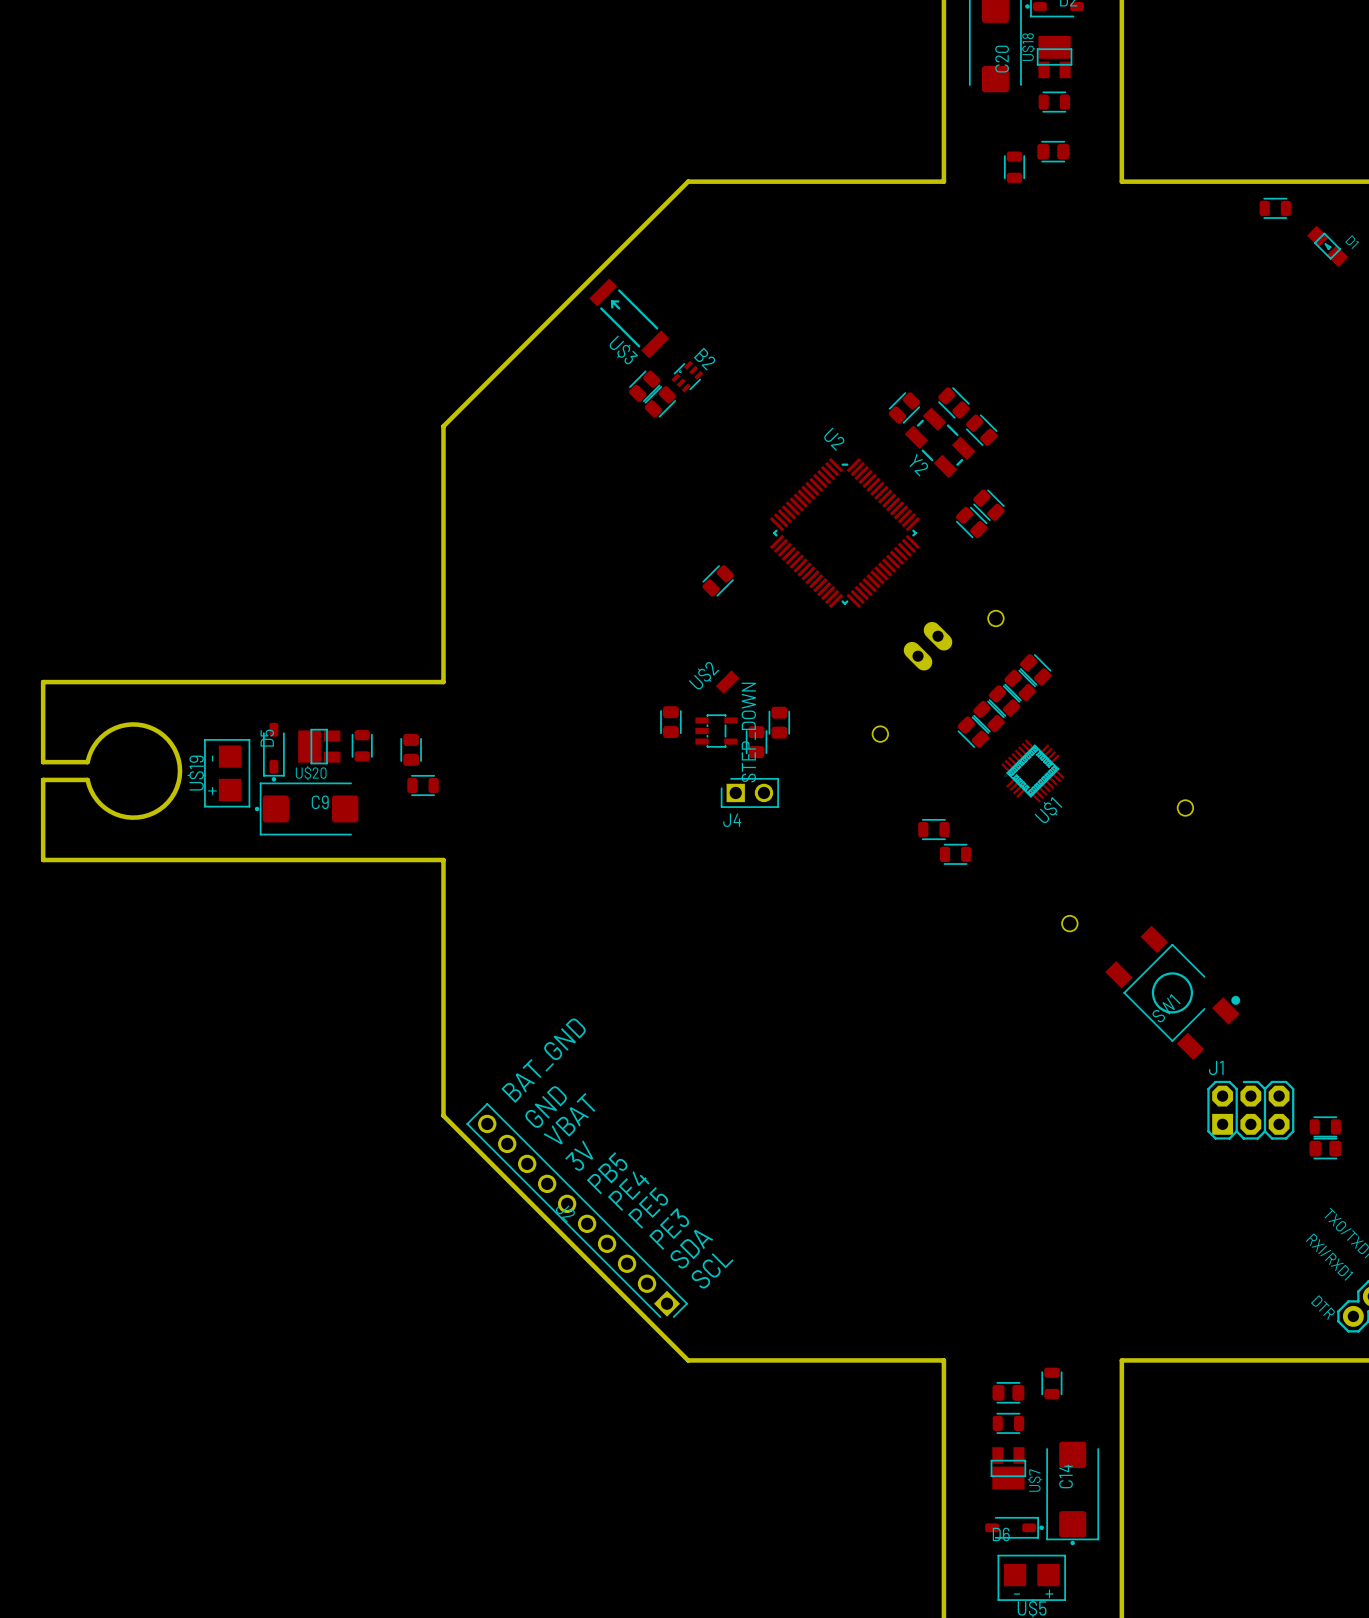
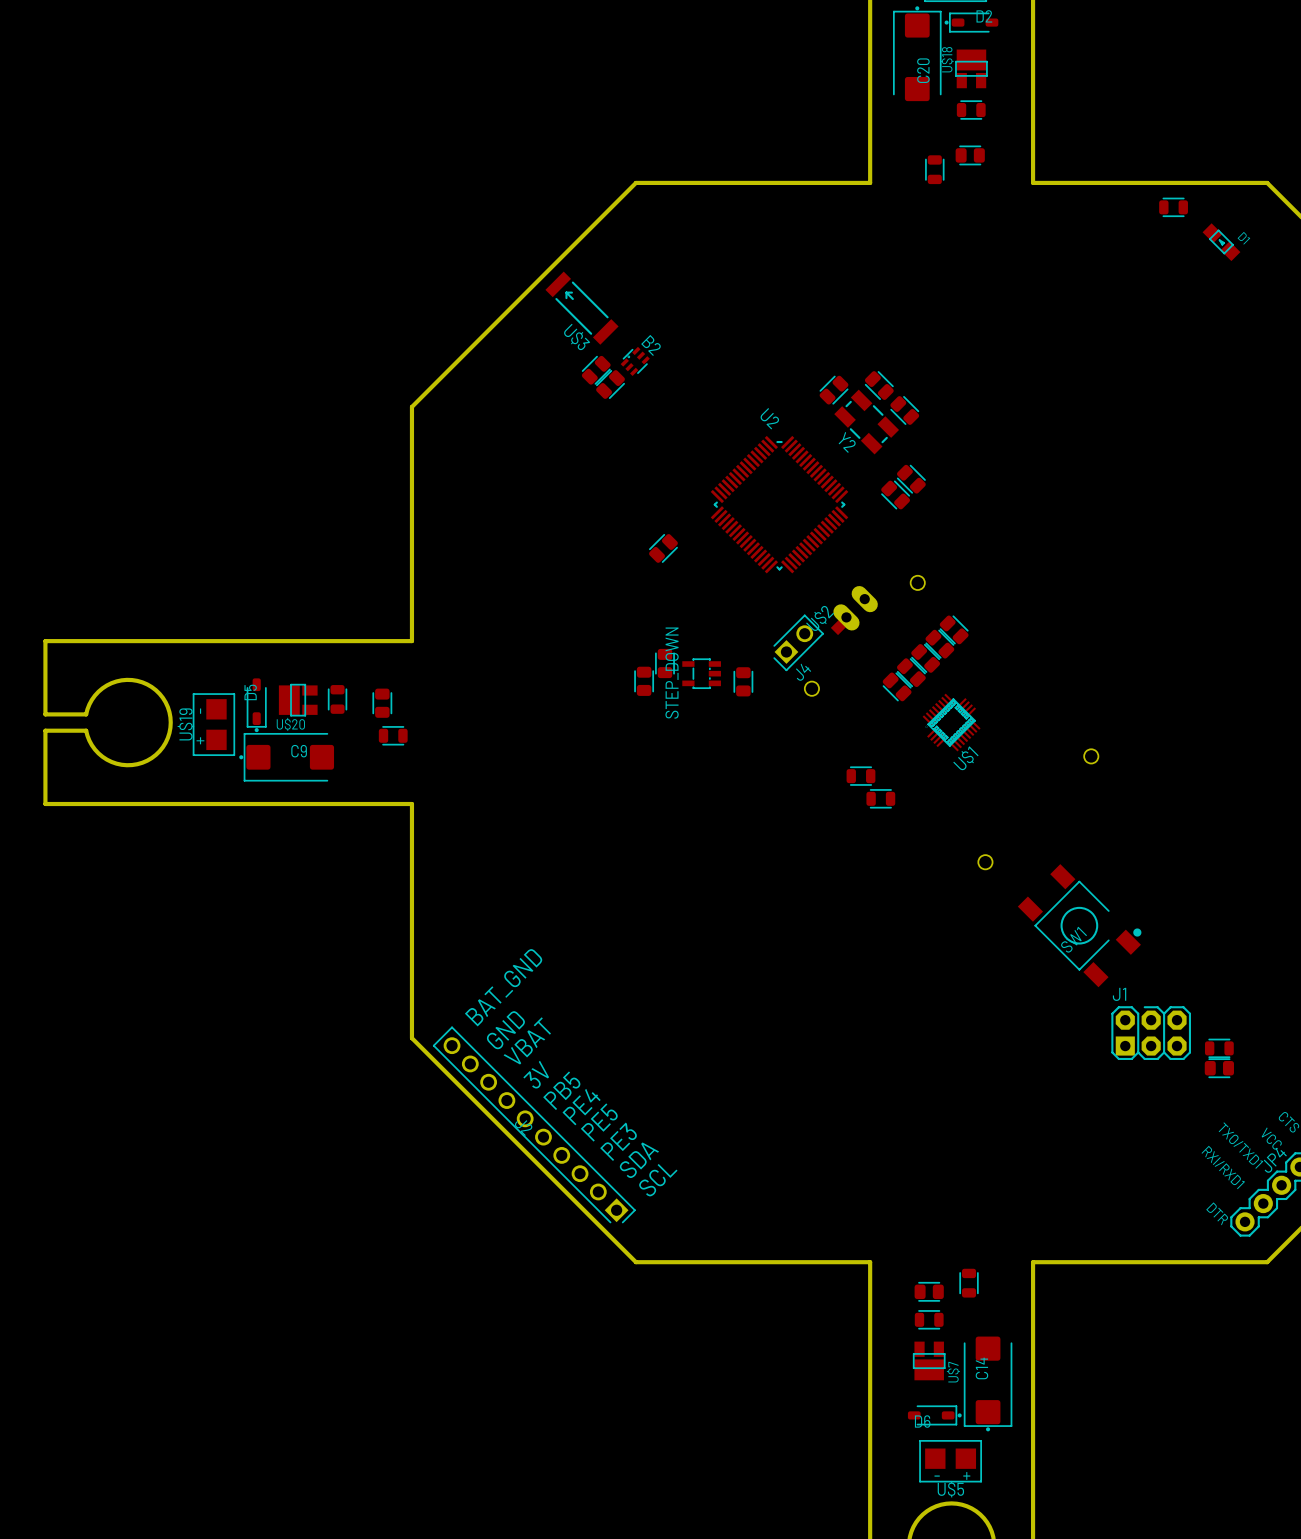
U$2 position: (727, 682) -> (841, 624)
part: none -> (664, 663)
part: (670, 722) -> none
part: (779, 722) -> none
part: none -> (644, 681)
part: none -> (743, 681)
STEP_DOWN rotation: 0° (716, 731) -> 180° (701, 673)
STEP_DOWN position: (716, 731) -> (701, 673)
part: (756, 742) -> none
J4 rotation: 0° (749, 792) -> 45° counterclockwise (798, 642)
J4 position: (749, 792) -> (798, 642)

